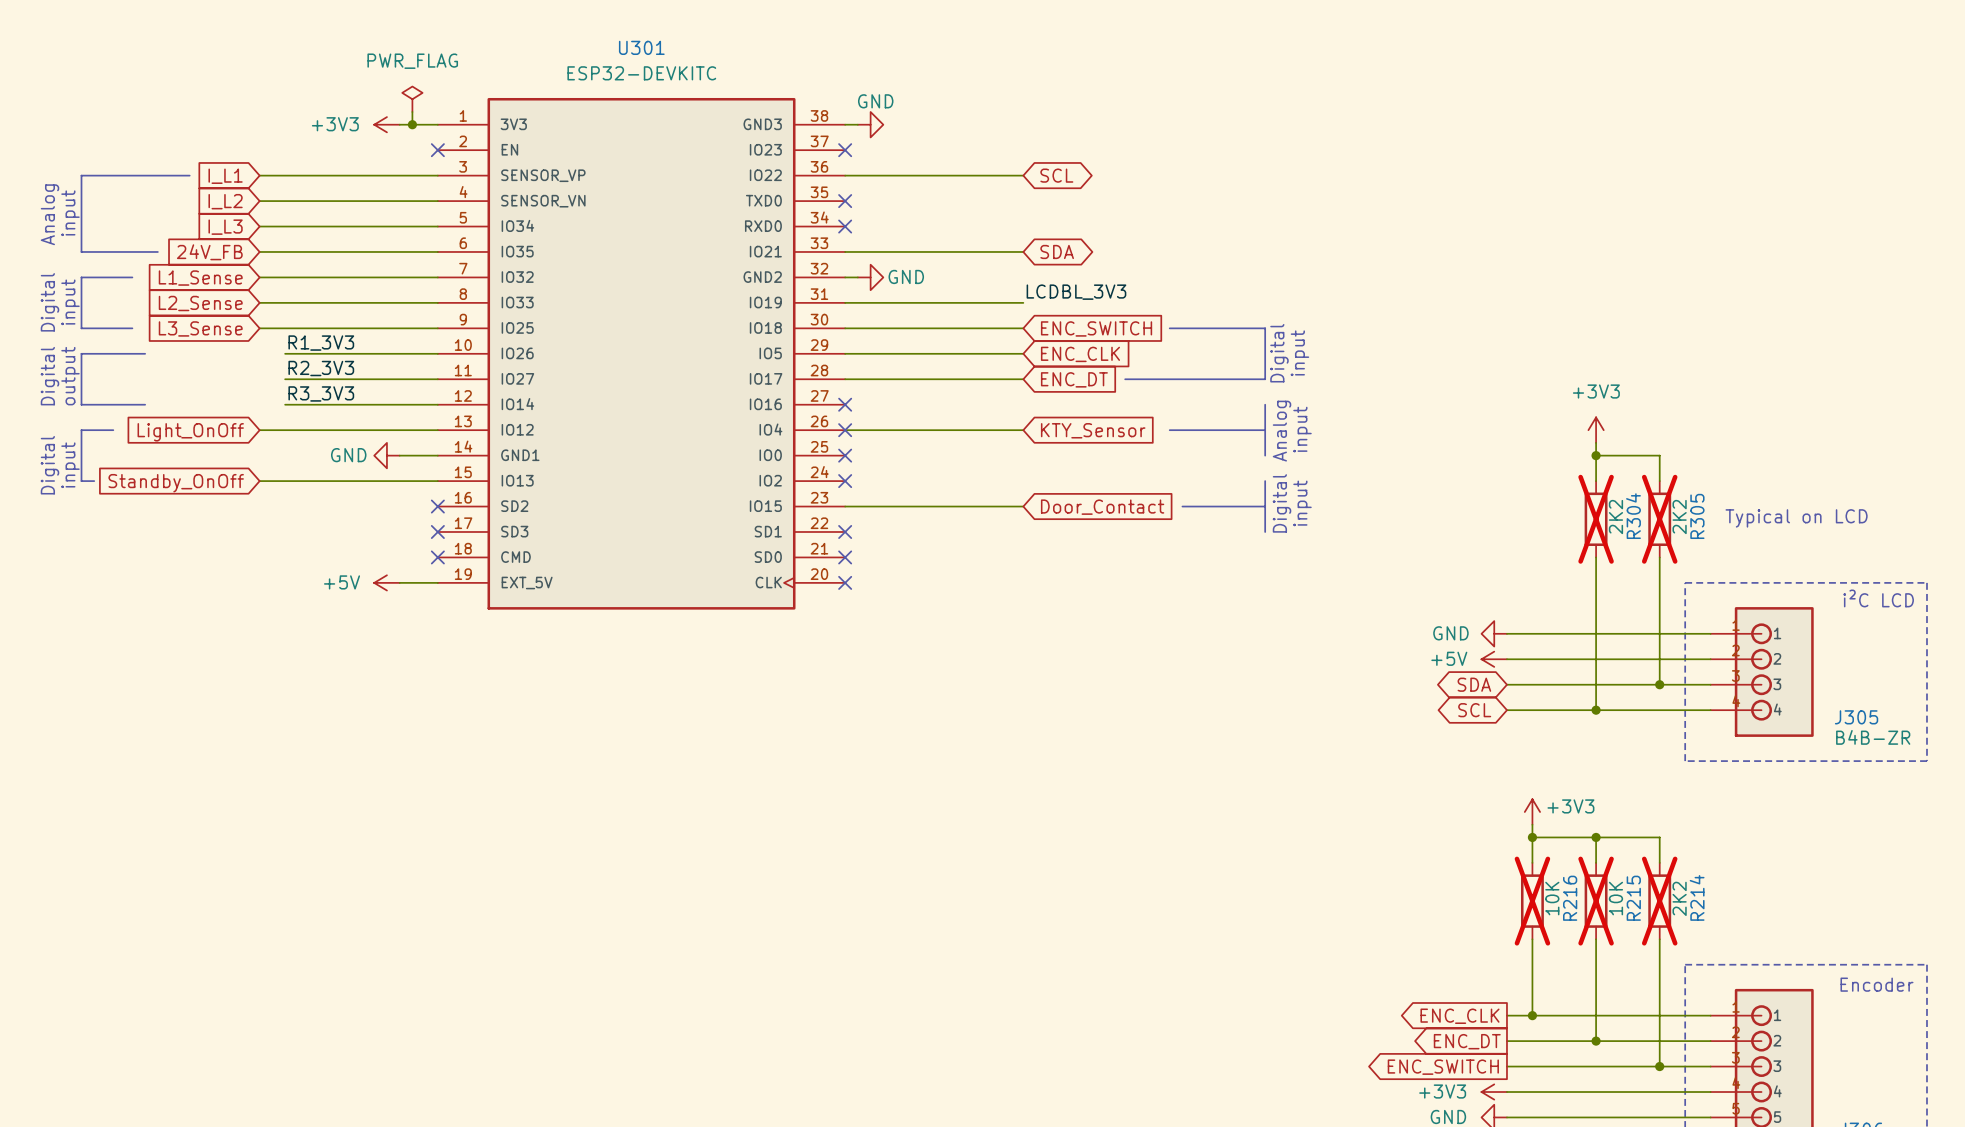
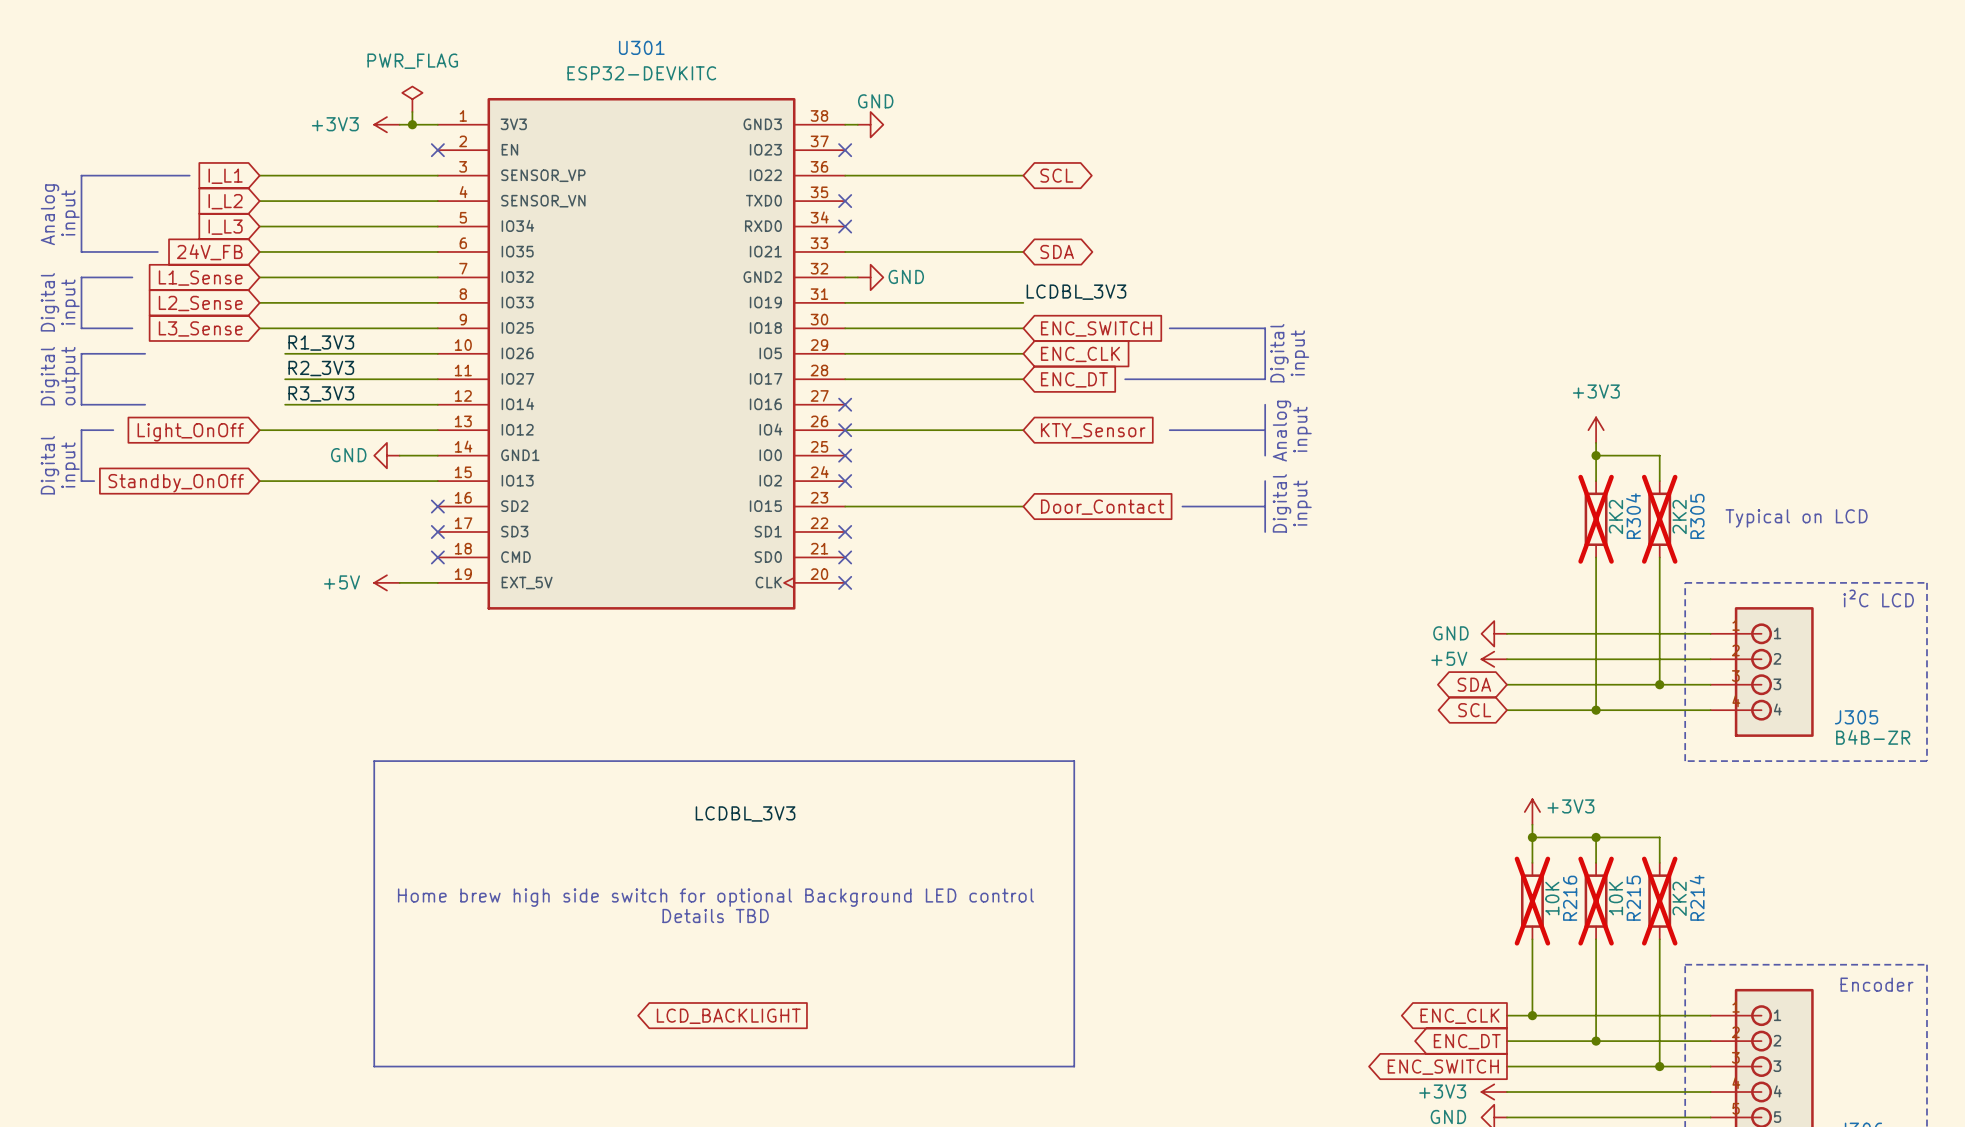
line: none -> (374, 761) (1074, 761) (1074, 1066) (374, 1066) (374, 761)
label: none -> LCDBL_3V3 (745, 813)
text: none -> Home brew high side switch for optional Background LED control (715, 897)
text: none -> Details TBD (715, 915)
global label: none -> LCD_BACKLIGHT (728, 1016)

